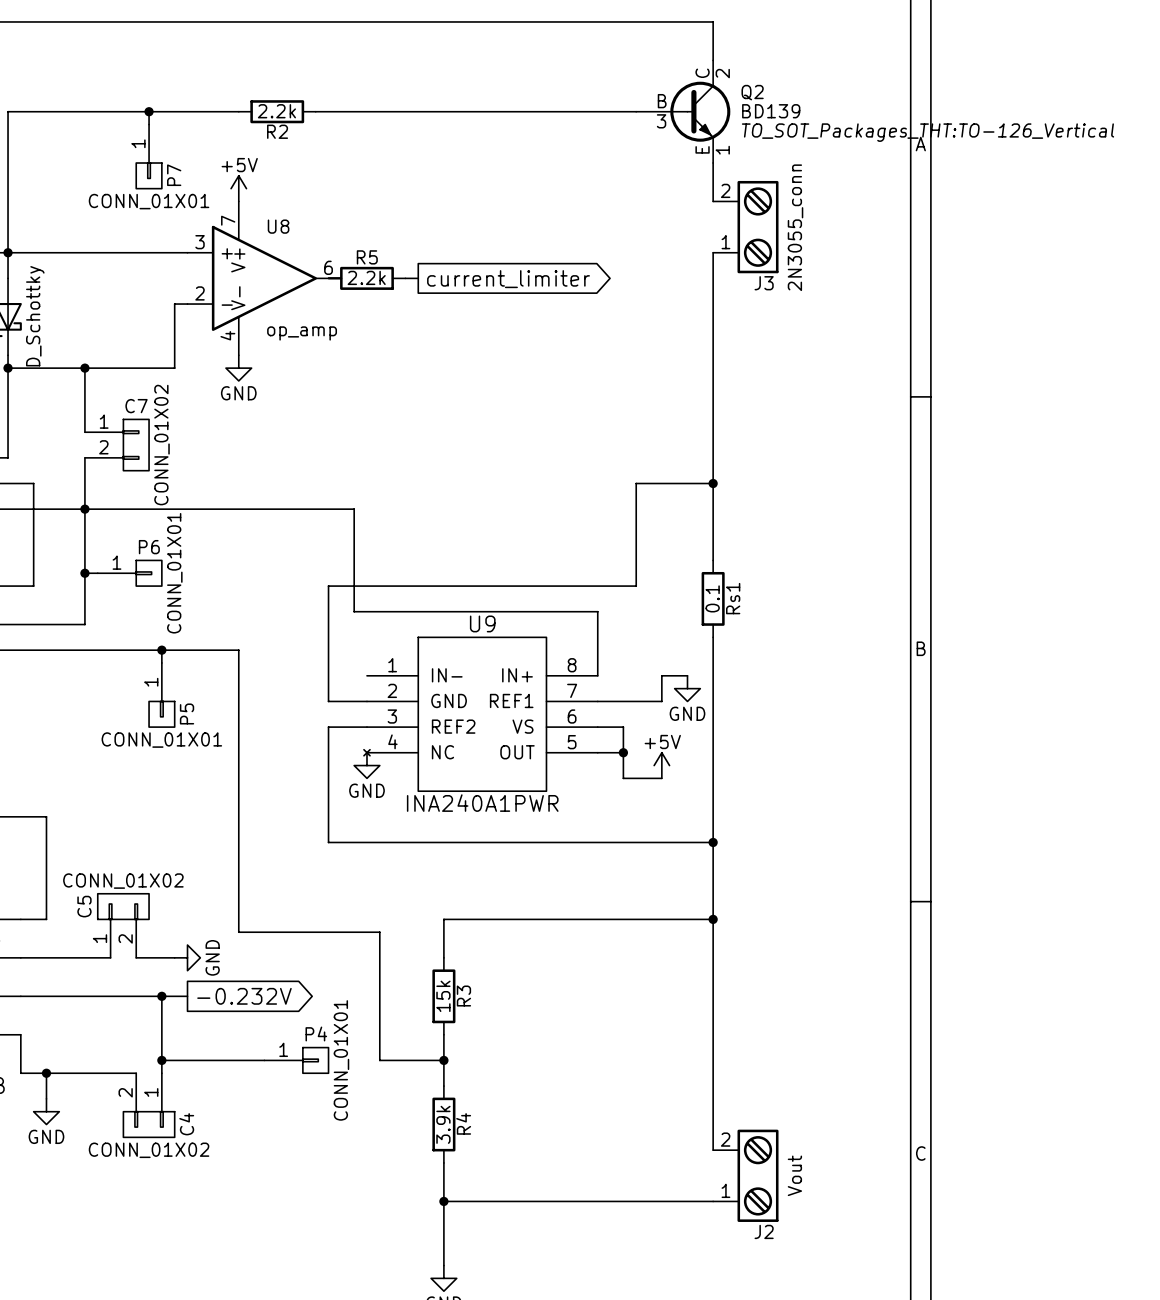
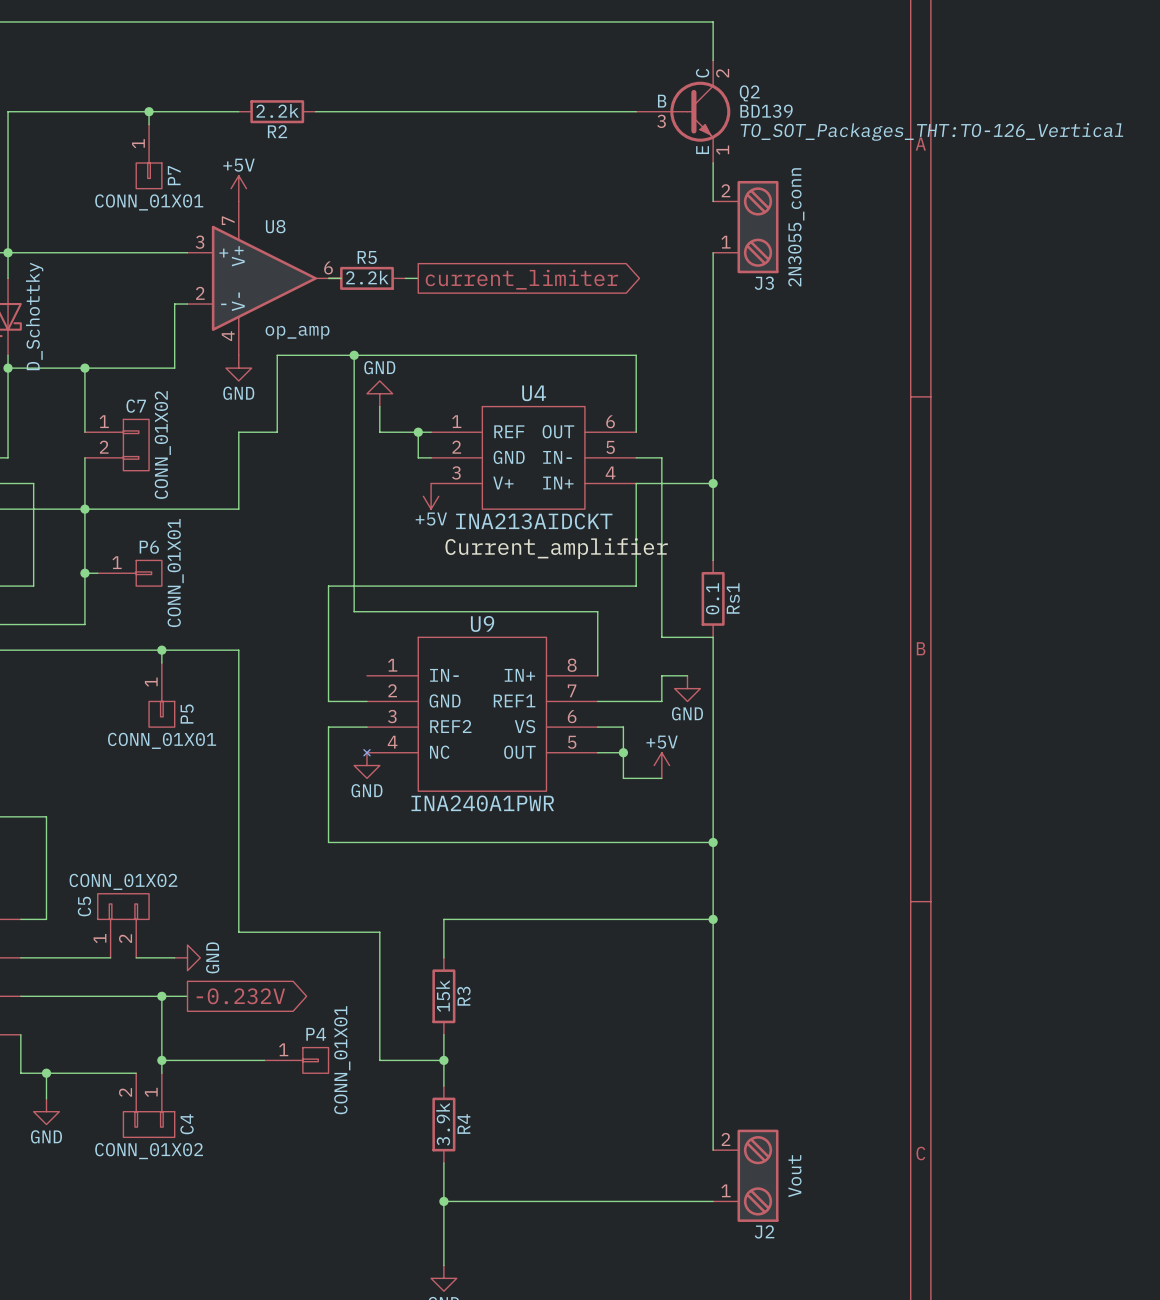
junction: none -> (354, 355)
power symbol: none -> GND (379, 393)
wire: none -> (379, 406) (379, 432) (431, 432)
wire: none -> (418, 432) (418, 457) (431, 457)
junction: none -> (418, 432)
wire: none -> (636, 432) (636, 355) (277, 355) (277, 432) (238, 432) (238, 509)
U4: none -> INA213AIDCKT (533, 457)
wire: none -> (636, 457) (661, 457) (661, 637) (713, 637)
power symbol: none -> +5V (431, 496)
wire: (238, 509) (354, 509) -> (354, 355) (354, 509)
label: none -> Current_amplifier (556, 548)

